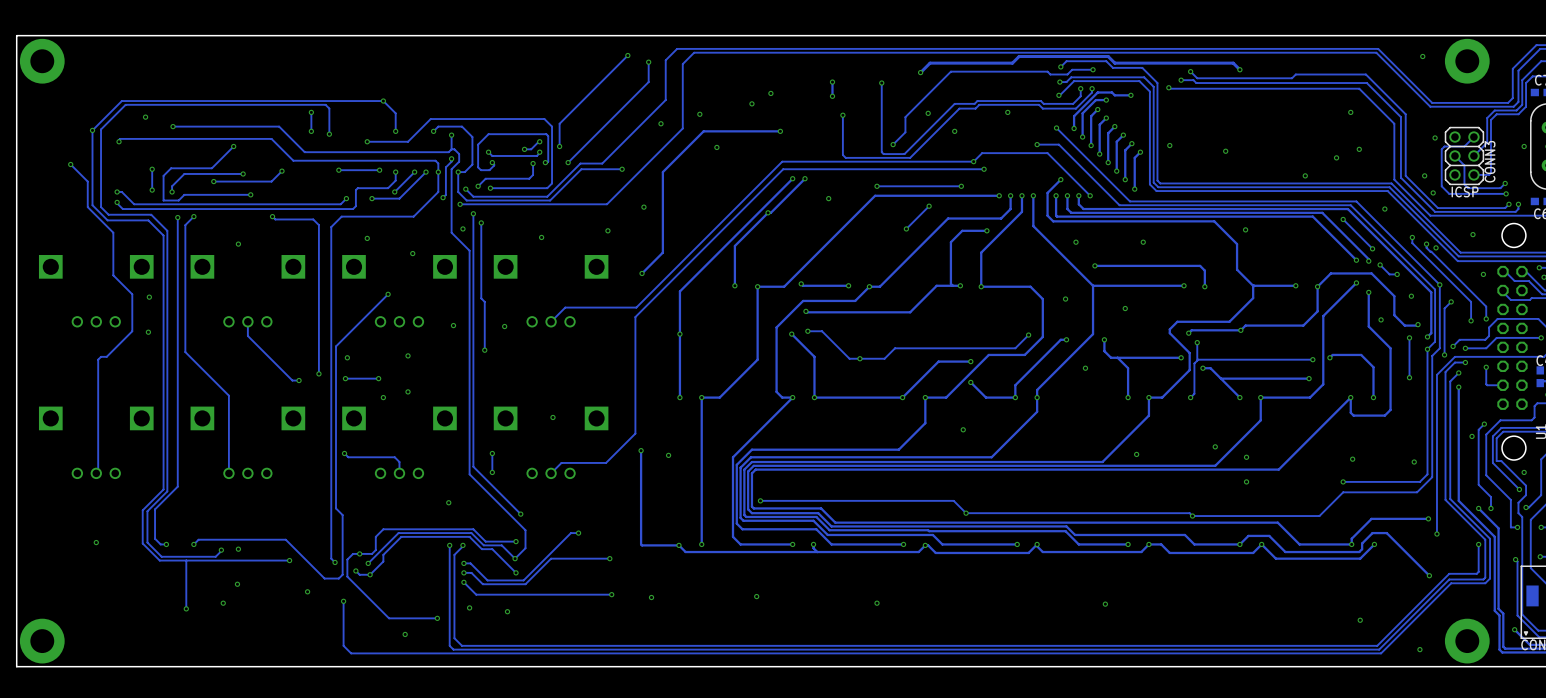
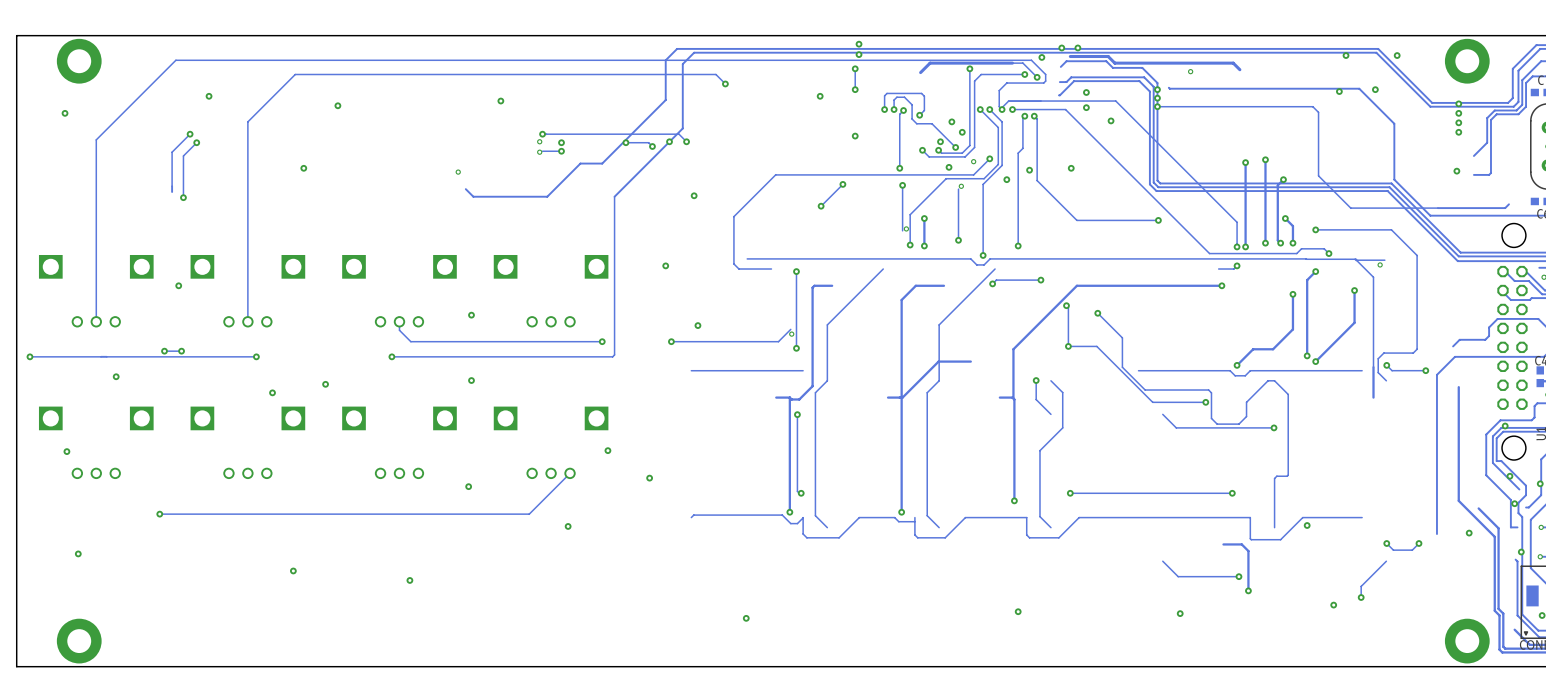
via: none -> (859, 44)
via: none -> (1061, 47)
via: none -> (1077, 47)
via: none -> (859, 54)
track: (627, 55) (559, 123) (559, 146) -> none
via: (627, 55) -> none
via: none -> (1346, 55)
via: none -> (1397, 55)
track: (1070, 56) (1019, 56) (1012, 63) -> (1037, 77) (1022, 63) (1012, 63)
via: (1422, 56) -> none
via: none -> (1041, 57)
via position: (42, 61) -> (79, 61)
track: (648, 62) (648, 82) (568, 162) -> none
via: (648, 62) -> none
via: (1060, 66) -> none
track: none -> (855, 68) (855, 89)
via: none -> (855, 68)
track: none -> (969, 68) (969, 145) (962, 153) (941, 153) (938, 150)
via: none -> (969, 68)
track: (1093, 69) (1072, 69) (1067, 74) (1050, 74) (1047, 71) (950, 71) (905, 117) (905, 132) (893, 144) -> none
via: (1093, 69) -> none
via: (1239, 69) -> none
track: (1190, 71) (1197, 78) (1292, 78) (1295, 74) (1365, 74) (1405, 114) (1405, 175) (1437, 208) -> (1157, 106) (1312, 106) (1318, 112) (1318, 175) (1350, 208) (1437, 208)
via: (920, 72) -> none
track: none -> (1024, 74) (981, 74) (974, 81) (974, 147) (965, 156) (929, 156) (922, 150)
via: none -> (1024, 74)
via: none -> (1037, 77)
track: (1181, 80) (1193, 80) (1196, 83) (1366, 83) (1400, 117) (1400, 177) (1435, 211) (1515, 211) (1518, 209) (1518, 204) -> none
via: (1181, 80) -> none
track: (832, 82) (832, 96) -> none
via: (832, 82) -> none
via: (1059, 82) -> none
via: none -> (725, 83)
track: (881, 83) (881, 152) (883, 154) (904, 154) (954, 103) (974, 103) (977, 101) (1008, 101) -> (96, 321) (96, 139) (175, 60) (1031, 60) (1045, 74) (1045, 81) (1043, 83) (1006, 83) (999, 90) (999, 106) (1002, 109) (1008, 101)
via: (881, 83) -> none
via: (1168, 87) -> none
track: (1080, 88) (1080, 96) (1073, 103) (1043, 103) (1040, 101) -> none
via: (1080, 88) -> none
track: (1092, 88) (1092, 92) (1075, 108) (1042, 108) (1039, 104) (979, 104) (975, 108) (959, 108) (910, 157) (845, 157) (842, 155) (842, 115) -> none
via: (1092, 88) -> none
via: none -> (855, 89)
via: none -> (1157, 89)
via: none -> (1375, 89)
via: none -> (1339, 91)
via: none -> (1086, 92)
via: (770, 93) -> none
via: (1058, 95) -> none
track: (1130, 95) (1097, 92) (1074, 116) (1074, 128) -> none
via: (1130, 95) -> none
via: none -> (209, 96)
via: none -> (820, 96)
via: (832, 96) -> none
via: none -> (1157, 98)
track: (1106, 100) (1095, 100) (1082, 113) (1082, 137) -> none
via: (1106, 100) -> none
via: (383, 101) -> none
via: none -> (500, 101)
via: (751, 103) -> none
via: none -> (1458, 103)
via: none -> (337, 105)
via: none -> (1157, 106)
via: none -> (1086, 107)
track: none -> (884, 109) (884, 95) (886, 93) (921, 93) (924, 96) (924, 110) (919, 115)
via: none -> (884, 109)
track: none -> (894, 109) (894, 100) (896, 97) (904, 97) (912, 104) (912, 119) (916, 123) (931, 123) (955, 147)
via: none -> (894, 109)
track: none -> (980, 109) (998, 127) (998, 164) (984, 178) (946, 178) (910, 214) (910, 245)
via: none -> (980, 109)
track: none -> (989, 109) (1002, 121) (1002, 165) (983, 184) (983, 255)
via: none -> (989, 109)
via: none -> (1002, 109)
track: none -> (1012, 109) (1065, 109) (1209, 253) (1296, 253) (1301, 248) (1324, 248) (1328, 253)
via: none -> (1012, 109)
track: (1097, 109) (1091, 116) (1091, 145) -> none
via: (1097, 109) -> none
track: none -> (903, 110) (899, 114) (899, 168)
via: none -> (903, 110)
track: (311, 112) (311, 131) -> none
via: (311, 112) -> none
via: (1007, 112) -> none
via: (1350, 112) -> none
via: none -> (65, 113)
via: (928, 113) -> none
via: none -> (1458, 113)
via: (699, 114) -> none
via: (842, 115) -> none
via: none -> (919, 115)
track: none -> (1024, 116) (1022, 118) (1022, 148) (1018, 153) (1018, 245)
via: none -> (1024, 116)
track: none -> (1034, 116) (1037, 119) (1037, 180) (1076, 220) (1158, 220)
via: none -> (1034, 116)
via: (145, 117) -> none
track: (1106, 118) (1099, 124) (1099, 154) -> none
via: (1106, 118) -> none
via: none -> (1111, 120)
via: none -> (951, 121)
via: none -> (1458, 122)
via: (660, 123) -> none
track: (173, 126) (279, 126) (304, 152) (448, 152) (451, 149) -> none
via: (173, 126) -> none
track: (1114, 126) (1108, 133) (1108, 162) -> none
via: (1114, 126) -> none
track: (1056, 128) (1129, 201) (1356, 201) (1439, 284) (1439, 348) (1432, 355) (1432, 477) (1417, 492) (1343, 492) (1319, 516) (1192, 516) (1189, 513) (966, 513) (953, 500) (760, 500) -> none
via: (1056, 128) -> none
via: (1074, 128) -> none
via: (92, 130) -> none
via: (311, 131) -> none
track: (395, 131) (395, 113) (383, 101) (121, 101) (92, 130) (92, 205) (107, 220) (148, 220) (163, 235) (163, 489) (142, 510) (142, 543) (159, 560) (289, 560) -> none
via: (395, 131) -> none
track: (433, 131) (438, 126) (462, 126) (472, 137) (472, 164) (464, 172) (458, 172) (458, 191) (466, 200) (550, 200) (581, 169) (622, 169) -> none
via: (433, 131) -> none
track: (780, 131) (703, 131) (662, 172) (662, 252) (642, 273) -> none
via: (780, 131) -> none
via: (954, 131) -> none
via: none -> (962, 132)
via: none -> (1458, 132)
via: none -> (190, 134)
track: (329, 134) (329, 108) (325, 104) (125, 104) (101, 129) (101, 207) (108, 214) (151, 214) (167, 230) (167, 491) (147, 511) (147, 542) (161, 556) (215, 556) (221, 550) -> none
via: (329, 134) -> none
track: (542, 134) (488, 134) (478, 144) (478, 167) (480, 170) (489, 170) (494, 165) (492, 162) -> none
via: none -> (542, 134)
track: (546, 134) (548, 136) (548, 161) (545, 162) -> (546, 134) (678, 134) (686, 141)
track: (451, 135) (451, 149) -> none
via: (451, 135) -> none
track: (1123, 135) (1116, 141) (1116, 171) -> none
via: (1123, 135) -> none
via: none -> (855, 136)
via: (1082, 137) -> none
via: (1435, 137) -> none
track: (1473, 137) (1464, 146) (1444, 146) (1441, 149) (1441, 186) (1449, 193) (1506, 193) -> none
track: (119, 141) (119, 138) (271, 138) (293, 160) (435, 160) (438, 163) (438, 191) (413, 216) (341, 216) (331, 227) (331, 558) (335, 562) -> none
via: (119, 141) -> none
track: (367, 141) (408, 141) (430, 119) (544, 119) (552, 126) (552, 183) (547, 188) (490, 188) -> none
via: (367, 141) -> none
track: (539, 141) (531, 149) (524, 149) -> none
via: none -> (669, 141)
via: none -> (686, 141)
via: none -> (940, 141)
track: none -> (196, 142) (183, 155) (183, 197)
via: none -> (196, 142)
via: none -> (561, 142)
track: none -> (625, 142) (648, 142) (652, 146)
via: none -> (625, 142)
track: (1131, 143) (1125, 150) (1125, 179) -> none
via: (1131, 143) -> none
via: (893, 144) -> none
track: (1037, 144) (1058, 144) (1119, 205) (1350, 205) (1435, 289) (1435, 341) (1427, 349) (1427, 474) (1419, 481) (1343, 481) -> none
via: (1037, 144) -> none
via: (1091, 145) -> none
via: (1169, 145) -> none
track: (233, 146) (211, 168) (171, 168) (163, 175) (163, 200) (178, 200) (184, 194) (250, 194) -> none
via: (233, 146) -> none
via: (559, 146) -> none
via: none -> (652, 146)
via: (1524, 146) -> none
via: (716, 147) -> none
via: none -> (955, 147)
track: (451, 149) (454, 149) (459, 154) (459, 161) (451, 169) (451, 232) (469, 250) (469, 474) (525, 530) (525, 548) (515, 558) (501, 545) (483, 545) (471, 533) (398, 533) (368, 563) -> none
via: (524, 149) -> none
via: (1359, 149) -> none
via: none -> (922, 150)
via: none -> (938, 150)
track: none -> (561, 151) (542, 151)
via: none -> (561, 151)
via: (1225, 151) -> none
via: (488, 152) -> none
track: (539, 152) (536, 155) (492, 155) (488, 152) -> none
track: (1140, 152) (1134, 157) (1134, 189) -> none
via: (1140, 152) -> none
via: (1099, 154) -> none
track: (1454, 155) (1464, 165) (1464, 184) (1468, 188) (1500, 188) (1505, 183) -> none
CONN3: (1464, 155) -> none
via: (1336, 157) -> none
track: (451, 158) (451, 161) (445, 167) (445, 194) (443, 197) -> none
via: (451, 158) -> none
track: none -> (989, 158) (973, 174) (775, 174) (733, 216) (733, 263) (738, 269) (771, 269)
via: none -> (989, 158)
track: none -> (1265, 159) (1265, 243)
via: none -> (1265, 159)
via: (492, 162) -> none
via: (545, 162) -> none
via: (568, 162) -> none
via: (1108, 162) -> none
track: none -> (1245, 162) (1245, 246)
via: none -> (1245, 162)
track: (533, 163) (533, 174) (529, 178) (485, 178) (478, 186) -> none
via: (533, 163) -> none
track: (70, 164) (87, 181) (87, 207) (113, 232) (113, 275) (132, 294) (132, 331) (106, 356) -> (256, 356) (106, 356)
via: (70, 164) -> none
via: none -> (949, 167)
via: none -> (303, 168)
via: none -> (899, 168)
via: none -> (1071, 168)
track: (152, 169) (152, 190) -> none
via: (152, 169) -> none
via: (622, 169) -> none
track: (984, 169) (783, 169) (635, 317) (635, 433) (606, 462) (561, 462) (551, 473) -> none
via: (984, 169) -> none
via: (338, 170) -> none
track: (379, 170) (338, 170) -> none
via: (379, 170) -> none
via: none -> (1029, 170)
track: (281, 171) (271, 181) (213, 181) -> none
via: (281, 171) -> none
via: (1116, 171) -> none
via: none -> (1456, 171)
track: (395, 172) (395, 180) (388, 188) (357, 188) (355, 190) (355, 206) (353, 209) (122, 209) (117, 202) -> none
via: (395, 172) -> none
track: (414, 172) (394, 191) -> none
via: (414, 172) -> none
track: (426, 172) (399, 198) (372, 198) -> none
via: (426, 172) -> none
via: (438, 172) -> none
track: (243, 173) (184, 173) (172, 186) -> (190, 134) (172, 152) (172, 186)
via: (243, 173) -> none
via: (1305, 175) -> none
via: (1424, 175) -> none
track: (792, 178) (679, 291) (679, 397) -> none
via: (792, 178) -> none
track: (805, 178) (734, 245) (734, 285) -> none
via: (805, 178) -> none
via: none -> (1006, 179)
track: (1060, 179) (1047, 192) (1047, 215) (1053, 221) (1214, 221) (1237, 244) -> (1040, 101) (1115, 101) (1237, 222) (1237, 244)
via: (1060, 179) -> none
via: (1125, 179) -> none
track: none -> (1283, 179) (1277, 185) (1277, 240) (1280, 243)
via: none -> (1283, 179)
via: (213, 181) -> none
via: (1505, 183) -> none
track: none -> (842, 184) (821, 206)
via: none -> (842, 184)
track: none -> (902, 185) (902, 230)
via: none -> (902, 185)
via: (478, 186) -> none
via: (877, 186) -> none
track: (961, 186) (877, 186) -> none
via: (490, 188) -> none
via: (465, 189) -> none
track: none -> (958, 189) (958, 240)
via: (1134, 189) -> none
via: (152, 190) -> none
track: (117, 191) (121, 191) (134, 204) (340, 204) (346, 198) -> none
via: (117, 191) -> none
via: (172, 191) -> none
via: (394, 191) -> none
text: ICSP (1465, 191) -> none
via: (1433, 192) -> none
via: (1506, 193) -> none
via: (250, 194) -> none
via: none -> (694, 195)
track: (999, 195) (875, 195) (784, 286) (757, 286) (757, 359) (719, 397) (701, 397) (701, 544) -> none
via: (999, 195) -> none
track: (1010, 195) (1010, 209) (1001, 218) (948, 218) (879, 286) (869, 286) (855, 300) (803, 300) (776, 327) (776, 391) (782, 397) -> (776, 397) (782, 397)
via: (1010, 195) -> none
track: (1021, 195) (1021, 211) (981, 252) (981, 286) (1030, 286) (1042, 299) (1042, 336) (1024, 354) (988, 354) (946, 397) (925, 397) (925, 423) (898, 449) (751, 449) (736, 464) (736, 523) (742, 529) (816, 529) (831, 544) (903, 544) -> none
via: (1021, 195) -> none
track: (1033, 195) (1033, 226) (1093, 285) (1093, 334) (1037, 390) (1037, 411) (991, 457) (751, 457) (740, 467) (740, 517) (743, 520) (813, 520) (827, 534) (932, 534) (942, 544) (1017, 544) -> none
via: (1033, 195) -> none
track: (1056, 195) (1057, 216) (1312, 216) (1355, 259) -> (747, 258) (970, 258) (976, 264) (984, 264) (990, 258) (1355, 259)
via: (1056, 195) -> none
track: (1067, 195) (1067, 209) (1071, 212) (1322, 212) (1368, 261) -> none
via: (1067, 195) -> none
track: (1078, 195) (1078, 204) (1083, 209) (1347, 209) (1431, 292) (1431, 333) (1427, 336) -> none
via: (1078, 195) -> none
track: (1090, 195) (1047, 153) (982, 153) (973, 161) (782, 161) (636, 307) (565, 307) (551, 321) -> none
via: (1090, 195) -> none
track: (614, 196) (606, 204) (460, 204) -> (614, 196) (614, 354) (612, 356) (391, 356)
via: none -> (183, 197)
via: (443, 197) -> none
via: (346, 198) -> none
via: (372, 198) -> none
via: (828, 198) -> none
via: (117, 202) -> none
via: (460, 204) -> none
via: (1508, 204) -> none
via: (1518, 204) -> none
via: none -> (821, 206)
track: (929, 206) (906, 228) -> none
via: (929, 206) -> none
via: (643, 207) -> none
via: (1384, 209) -> none
via: (768, 212) -> none
track: (473, 213) (473, 466) (520, 514) -> none
via: (473, 213) -> none
track: (193, 216) (185, 225) (185, 352) (228, 395) (228, 473) -> none
via: (193, 216) -> none
track: (272, 216) (275, 219) (313, 219) (318, 225) (318, 373) -> none
via: (272, 216) -> none
track: (177, 217) (177, 486) (155, 509) (155, 538) (160, 544) (166, 544) -> none
via: (177, 217) -> none
track: none -> (924, 218) (924, 245)
via: none -> (924, 218)
track: none -> (1285, 218) (1292, 226) (1292, 243)
via: none -> (1285, 218)
track: (1343, 219) (1372, 248) -> none
via: (1343, 219) -> none
via: none -> (1158, 220)
track: (481, 222) (481, 298) (484, 301) (484, 350) -> none
via: (481, 222) -> none
via: (462, 228) -> none
via: (1245, 229) -> none
track: none -> (1315, 229) (1391, 229) (1417, 255) (1417, 349) (1413, 353) (1383, 353) (1378, 358) (1378, 372) (1386, 380)
via: none -> (1315, 229)
via: (607, 230) -> none
track: (986, 230) (962, 230) (950, 242) (950, 283) (952, 285) -> none
via: (986, 230) -> none
via: (1472, 234) -> none
via: (541, 237) -> none
track: (1412, 237) (1412, 243) (1471, 301) (1471, 320) -> none
via: (1412, 237) -> none
via: (367, 238) -> none
via: none -> (958, 240)
via: (1075, 242) -> none
via: (1143, 242) -> none
via: none -> (1265, 243)
via: none -> (1280, 243)
via: none -> (1292, 243)
via: (238, 244) -> none
track: (1426, 244) (1426, 247) (1486, 306) (1486, 318) -> none
via: (1426, 244) -> none
via: none -> (910, 245)
via: none -> (924, 245)
via: none -> (1018, 245)
track: (1237, 246) (1237, 269) (1253, 285) (1295, 285) -> none
via: none -> (1237, 246)
via: none -> (1245, 246)
via: (1436, 247) -> none
via: (1372, 248) -> none
via: (412, 253) -> none
via: none -> (1328, 253)
via: none -> (983, 255)
via: (1356, 260) -> none
via: (1368, 261) -> none
track: (1380, 264) (1389, 274) (1397, 274) -> none
via: none -> (665, 265)
track: (1094, 265) (1200, 265) (1204, 270) (1204, 286) -> none
via: (1094, 265) -> none
track: none -> (1237, 265) (1233, 269) (1218, 269)
via: none -> (1237, 265)
via: (1539, 267) -> none
track: none -> (883, 269) (827, 324) (827, 380) (815, 392) (815, 515) (827, 527)
track: none -> (995, 269) (939, 324) (939, 380) (927, 392) (927, 515) (939, 527)
track: none -> (796, 271) (796, 348)
via: none -> (796, 271)
track: none -> (1315, 271) (1307, 280) (1307, 355)
via: none -> (1315, 271)
via: (642, 273) -> none
via: (1397, 274) -> none
via: (1483, 274) -> none
track: none -> (1040, 280) (996, 280) (992, 283)
via: none -> (1040, 280)
track: (1356, 282) (1323, 316) (1323, 384) (1310, 397) (1260, 397) (1260, 420) (1215, 465) (753, 465) (748, 471) (748, 509) (751, 513) (818, 513) (831, 526) (1066, 526) (1075, 534) (1184, 534) (1194, 544) (1223, 544) -> none
via: (1356, 282) -> none
track: (801, 283) (803, 285) (814, 285) -> (789, 512) (789, 397) (799, 399) (812, 386) (812, 287) (814, 285)
via: (801, 283) -> none
via: none -> (992, 283)
via: (1439, 284) -> none
via: none -> (178, 285)
via: (734, 285) -> none
track: (848, 285) (832, 285) -> none
via: (848, 285) -> none
track: (936, 285) (910, 312) (805, 311) -> (936, 285) (915, 285) (901, 300) (901, 512)
track: (960, 285) (943, 285) -> none
via: (960, 285) -> none
track: none -> (1093, 285) (1076, 285) (1013, 349) (1013, 398)
via: (1184, 285) -> none
track: none -> (1221, 285) (1184, 285)
via: none -> (1221, 285)
track: (1254, 285) (1253, 298) (1229, 321) (1177, 321) (1169, 329) (1169, 333) (1189, 353) (1189, 370) (1162, 397) (1148, 397) (1148, 415) (1102, 462) (751, 462) (744, 469) (744, 515) (746, 516) (816, 516) (829, 530) (1065, 531) (1078, 544) (1128, 544) -> none
via: (1295, 285) -> none
via: (757, 286) -> none
via: (869, 286) -> none
via: (981, 286) -> none
via: (1204, 286) -> none
via: (1317, 286) -> none
track: none -> (1354, 290) (1354, 322) (1315, 361)
via: none -> (1354, 290)
track: (1368, 292) (1368, 326) (1390, 348) (1390, 409) (1384, 415) (1353, 415) (1350, 412) (1350, 397) (1278, 469) (755, 469) (751, 473) (751, 506) (753, 508) (821, 508) (835, 522) (1277, 522) (1299, 544) (1351, 544) (1351, 538) (1371, 518) (1428, 518) -> none
via: (1368, 292) -> none
track: (388, 294) (336, 346) (336, 508) (342, 515) (342, 574) (338, 578) (324, 578) (285, 539) (198, 539) (193, 544) -> none
via: (388, 294) -> none
track: none -> (1292, 294) (1292, 329) (1273, 349) (1253, 349) (1237, 365)
via: none -> (1292, 294)
via: (1411, 296) -> none
via: (149, 297) -> none
via: (1065, 299) -> none
track: (1451, 301) (1444, 308) (1444, 354) -> none
via: (1451, 301) -> none
track: none -> (1066, 305) (1068, 307) (1068, 346) (1096, 346) (1152, 402) (1205, 402)
via: none -> (1066, 305)
via: (1125, 308) -> none
via: (805, 311) -> none
track: none -> (1097, 313) (1122, 337) (1122, 367) (1145, 390) (1208, 390) (1211, 392) (1211, 418) (1217, 424) (1238, 424) (1246, 416) (1246, 402) (1268, 380) (1274, 380) (1288, 394) (1288, 475) (1276, 476) (1274, 478) (1274, 527)
via: none -> (1097, 313)
via: none -> (471, 315)
via: (1486, 318) -> none
via: (1381, 319) -> none
via: (1471, 320) -> none
track: (247, 321) (247, 336) (292, 380) (299, 380) -> (247, 321) (247, 121) (295, 74) (715, 74) (725, 83)
track: none -> (399, 321) (399, 330) (410, 341) (602, 341)
track: (1418, 324) (1404, 325) (1394, 315) (1394, 296) (1371, 273) (1330, 273) (1317, 286) (1317, 311) (1303, 325) (1245, 325) (1240, 330) (1191, 330) (1188, 333) -> none
via: (1418, 324) -> none
via: (453, 325) -> none
via: none -> (697, 325)
via: (504, 326) -> none
track: none -> (790, 329) (778, 341) (671, 341)
via: (1240, 330) -> none
track: (807, 331) (822, 331) (849, 358) (884, 358) (895, 348) (1015, 348) (1028, 335) -> none
via: (807, 331) -> none
via: (148, 332) -> none
via: (1188, 333) -> none
via: (679, 334) -> none
track: (791, 334) (814, 356) (814, 397) (888, 397) -> none
via: (1028, 335) -> none
via: (1427, 336) -> none
track: (1409, 337) (1409, 377) -> none
via: (1409, 337) -> none
track: (1541, 337) (1496, 337) (1486, 348) (1465, 348) -> none
via: (1541, 337) -> none
track: (1066, 339) (1060, 339) (1015, 385) (1015, 397) (1012, 397) -> (1014, 500) (1014, 399) (1012, 397)
via: (1066, 339) -> none
track: (1104, 339) (1104, 351) (1111, 357) (1181, 357) -> none
via: (1104, 339) -> none
via: none -> (602, 341)
via: none -> (671, 341)
track: (1197, 342) (1197, 360) -> none
via: (1197, 342) -> none
via: none -> (1068, 346)
via: (1453, 346) -> none
via: none -> (796, 348)
via: (1465, 348) -> none
via: (1427, 349) -> none
via: (484, 350) -> none
via: none -> (164, 351)
track: none -> (181, 351) (164, 351)
via: none -> (181, 351)
via: (1444, 354) -> none
via: (408, 355) -> none
via: none -> (1307, 355)
via: none -> (29, 356)
track: (101, 356) (98, 359) (98, 471) (96, 473) -> (101, 356) (29, 356)
via: none -> (256, 356)
via: none -> (391, 356)
via: (347, 357) -> none
track: (1117, 357) (1128, 368) (1128, 397) -> none
via: (1181, 357) -> none
track: (1329, 357) (1332, 354) (1361, 354) (1373, 367) -> (1384, 260) (1356, 260) (1373, 277) (1373, 367)
via: (1329, 357) -> none
via: (859, 358) -> none
via: (1312, 359) -> none
track: (1311, 360) (1198, 359) (1194, 363) (1194, 393) (1190, 397) -> none
via: (970, 361) -> none
via: none -> (1315, 361)
track: (1465, 362) (1454, 362) (1445, 372) (1445, 499) (1485, 539) (1485, 577) (1483, 579) (1449, 579) (1379, 649) (453, 649) (449, 645) (449, 545) -> none
via: (1465, 362) -> none
via: none -> (1237, 365)
track: none -> (1386, 365) (1392, 370) (1425, 370)
via: none -> (1386, 365)
track: (1486, 367) (1486, 384) (1502, 385) -> none
via: (1486, 367) -> none
via: (1085, 368) -> none
track: (1202, 368) (1210, 368) (1239, 397) -> none
via: (1202, 368) -> none
track: none -> (803, 370) (691, 370)
track: none -> (1362, 370) (1250, 370) (1245, 375) (1235, 375) (1230, 370) (1138, 370)
via: none -> (1425, 370)
track: (1458, 372) (1450, 381) (1450, 498) (1490, 538) (1490, 578) (1485, 583) (1451, 583) (1381, 653) (351, 653) (343, 645) (343, 601) -> none
via: (1458, 372) -> none
via: (318, 373) -> none
via: none -> (116, 376)
via: (1409, 377) -> none
via: (345, 378) -> none
track: (378, 378) (345, 378) -> none
via: (378, 378) -> none
track: (1309, 378) (1220, 378) -> none
via: (1309, 378) -> none
via: (299, 380) -> none
via: none -> (471, 380)
track: none -> (1036, 380) (1036, 399) (1050, 414)
via: none -> (1036, 380)
track: none -> (1050, 380) (1062, 392) (1062, 427) (1039, 450) (1039, 516) (1050, 527)
track: (970, 382) (985, 397) (999, 397) -> none
via: (970, 382) -> none
via: none -> (325, 384)
via: (1458, 387) -> none
via: (408, 391) -> none
via: none -> (272, 392)
via: (383, 397) -> none
via: (679, 397) -> none
via: (701, 397) -> none
track: (789, 397) (792, 397) (733, 457) (733, 536) (740, 544) (792, 544) -> none
via: (792, 397) -> none
via: (814, 397) -> none
via: (902, 397) -> none
via: (925, 397) -> none
via: (1015, 397) -> none
via: (1037, 397) -> none
via: (1128, 397) -> none
via: (1148, 397) -> none
via: (1190, 397) -> none
via: (1239, 397) -> none
via: (1260, 397) -> none
via: (1350, 397) -> none
via: (1373, 397) -> none
via: none -> (1205, 402)
track: none -> (797, 414) (797, 491) (801, 493)
via: none -> (797, 414)
track: none -> (1162, 414) (1176, 427) (1274, 427)
via: (552, 417) -> none
track: (1484, 424) (1478, 429) (1478, 484) (1490, 497) (1490, 508) -> none
via: (1484, 424) -> none
via: none -> (1505, 426)
via: none -> (1274, 427)
via: (963, 429) -> none
via: (1472, 436) -> none
via: (1215, 446) -> none
via: none -> (607, 450)
track: (641, 450) (641, 544) (678, 545) (685, 552) (918, 552) (925, 545) (928, 545) (935, 552) (1028, 552) (1037, 544) (1042, 552) (1141, 552) (1148, 544) (1161, 544) (1169, 552) (1253, 552) (1261, 544) (1275, 558) (1360, 558) (1374, 544) -> none
via: (641, 450) -> none
via: none -> (66, 451)
track: (344, 453) (348, 457) (394, 457) (399, 462) (399, 473) -> none
via: (344, 453) -> none
track: (492, 453) (492, 472) -> none
via: (492, 453) -> none
via: (1136, 454) -> none
via: (668, 455) -> none
via: (1246, 457) -> none
via: (1352, 459) -> none
via: (1414, 462) -> none
via: (492, 472) -> none
via: (1524, 472) -> none
track: none -> (570, 473) (529, 514) (159, 514)
via: none -> (1509, 476)
via: none -> (649, 478)
via: (1246, 481) -> none
via: (1343, 481) -> none
via: none -> (1540, 483)
via: none -> (468, 486)
via: (1519, 489) -> none
via: none -> (801, 493)
via: none -> (1070, 493)
track: none -> (1232, 493) (1070, 493)
via: none -> (1232, 493)
via: (760, 500) -> none
via: none -> (1014, 500)
via: (448, 502) -> none
via: none -> (1514, 503)
via: (1526, 507) -> none
via: (1478, 508) -> none
via: (1490, 508) -> none
via: none -> (789, 512)
via: none -> (901, 512)
via: (966, 513) -> none
via: none -> (159, 514)
via: (520, 514) -> none
via: (1192, 516) -> none
track: none -> (691, 517) (693, 515) (782, 515) (790, 523) (797, 523) (803, 517)
track: none -> (803, 517) (803, 534) (806, 537) (839, 537) (859, 517) (894, 517) (898, 521) (914, 521)
track: none -> (1362, 517) (1302, 517) (1280, 539) (1251, 539) (1250, 517) (1079, 517) (1058, 537) (1029, 537) (1026, 534) (1026, 517) (965, 517) (945, 537) (917, 537) (914, 534) (914, 517)
via: (1428, 518) -> none
via: none -> (1307, 525)
via: none -> (568, 526)
via: (1517, 527) -> none
track: (578, 533) (570, 533) (523, 580) (487, 580) (470, 563) (463, 563) -> none
via: (578, 533) -> none
via: none -> (1469, 533)
via: (1436, 534) -> none
track: (516, 541) (485, 541) (473, 529) (383, 529) (375, 536) (375, 550) (372, 553) (353, 553) (347, 559) (347, 576) (389, 618) (437, 618) -> none
via: (516, 541) -> none
via: (96, 542) -> none
via: none -> (1386, 543)
track: none -> (1418, 543) (1412, 550) (1393, 550) (1386, 543)
via: none -> (1418, 543)
via: (166, 544) -> none
via: (193, 544) -> none
via: (701, 544) -> none
via: (792, 544) -> none
track: (813, 544) (813, 548) (817, 552) -> none
via: (813, 544) -> none
via: (903, 544) -> none
via: (1017, 544) -> none
via: (1037, 544) -> none
via: (1128, 544) -> none
via: (1148, 544) -> none
track: (1239, 544) (1248, 535) (1269, 535) (1285, 552) (1359, 552) (1362, 549) (1362, 543) (1372, 533) (1386, 533) (1429, 575) -> (1239, 544) (1248, 551) (1248, 590)
via: (1239, 544) -> none
via: (1261, 544) -> none
via: (1351, 544) -> none
via: (1374, 544) -> none
track: (1478, 544) (1478, 571) (1476, 573) (1449, 573) (1377, 645) (462, 645) (454, 638) (454, 554) (462, 545) -> none
via: (1478, 544) -> none
via: (449, 545) -> none
via: (462, 545) -> none
via: (678, 545) -> none
via: (925, 545) -> none
via: (238, 549) -> none
via: (221, 550) -> none
via: none -> (1521, 552)
via: none -> (78, 553)
via: (359, 553) -> none
via: (515, 558) -> none
track: (609, 558) (551, 558) (525, 584) (482, 584) (471, 572) (463, 572) -> none
via: (609, 558) -> none
via: (1515, 559) -> none
track: (186, 560) (186, 608) -> none
via: (289, 560) -> none
track: none -> (1162, 561) (1178, 576) (1238, 576)
track: none -> (1386, 561) (1361, 586) (1361, 597)
via: (335, 562) -> none
via: (368, 563) -> none
via: (463, 563) -> none
via: none -> (293, 570)
track: (355, 570) (359, 574) (370, 574) (383, 561) (383, 554) (401, 536) (469, 536) (481, 549) (492, 549) (516, 572) -> none
via: (355, 570) -> none
via: (463, 572) -> none
via: (516, 572) -> none
via: (370, 574) -> none
via: (1429, 575) -> none
via: none -> (1238, 576)
via: none -> (409, 580)
track: (463, 582) (476, 594) (611, 594) -> none
via: (463, 582) -> none
via: (237, 584) -> none
via: none -> (1248, 590)
via: (307, 591) -> none
via: (611, 594) -> none
via: (756, 596) -> none
via: (651, 597) -> none
via: none -> (1361, 597)
via: (343, 601) -> none
via: (223, 603) -> none
via: (877, 603) -> none
via: (1105, 604) -> none
via: none -> (1333, 605)
via: (469, 607) -> none
via: (186, 608) -> none
via: (507, 611) -> none
via: none -> (1018, 611)
via: none -> (1180, 613)
via: none -> (1542, 615)
via: (437, 618) -> none
via: none -> (746, 618)
via: (1360, 620) -> none
via: (1514, 629) -> none
via: (405, 634) -> none
via position: (42, 641) -> (79, 641)
via: (1419, 649) -> none

